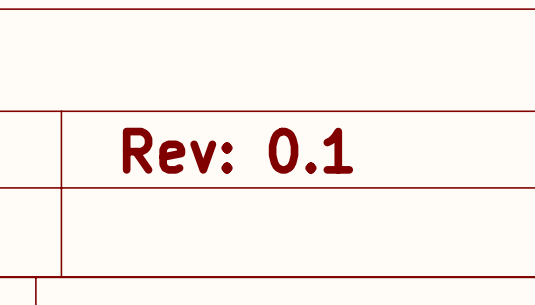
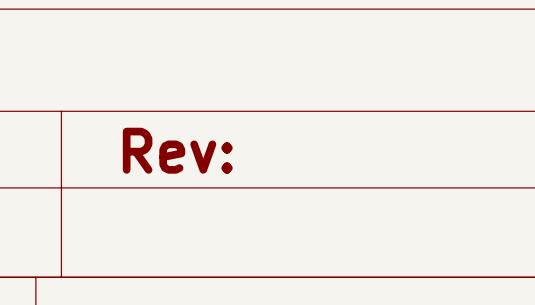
title block: Rev: 0.1 (237, 150) -> Rev: (177, 150)

